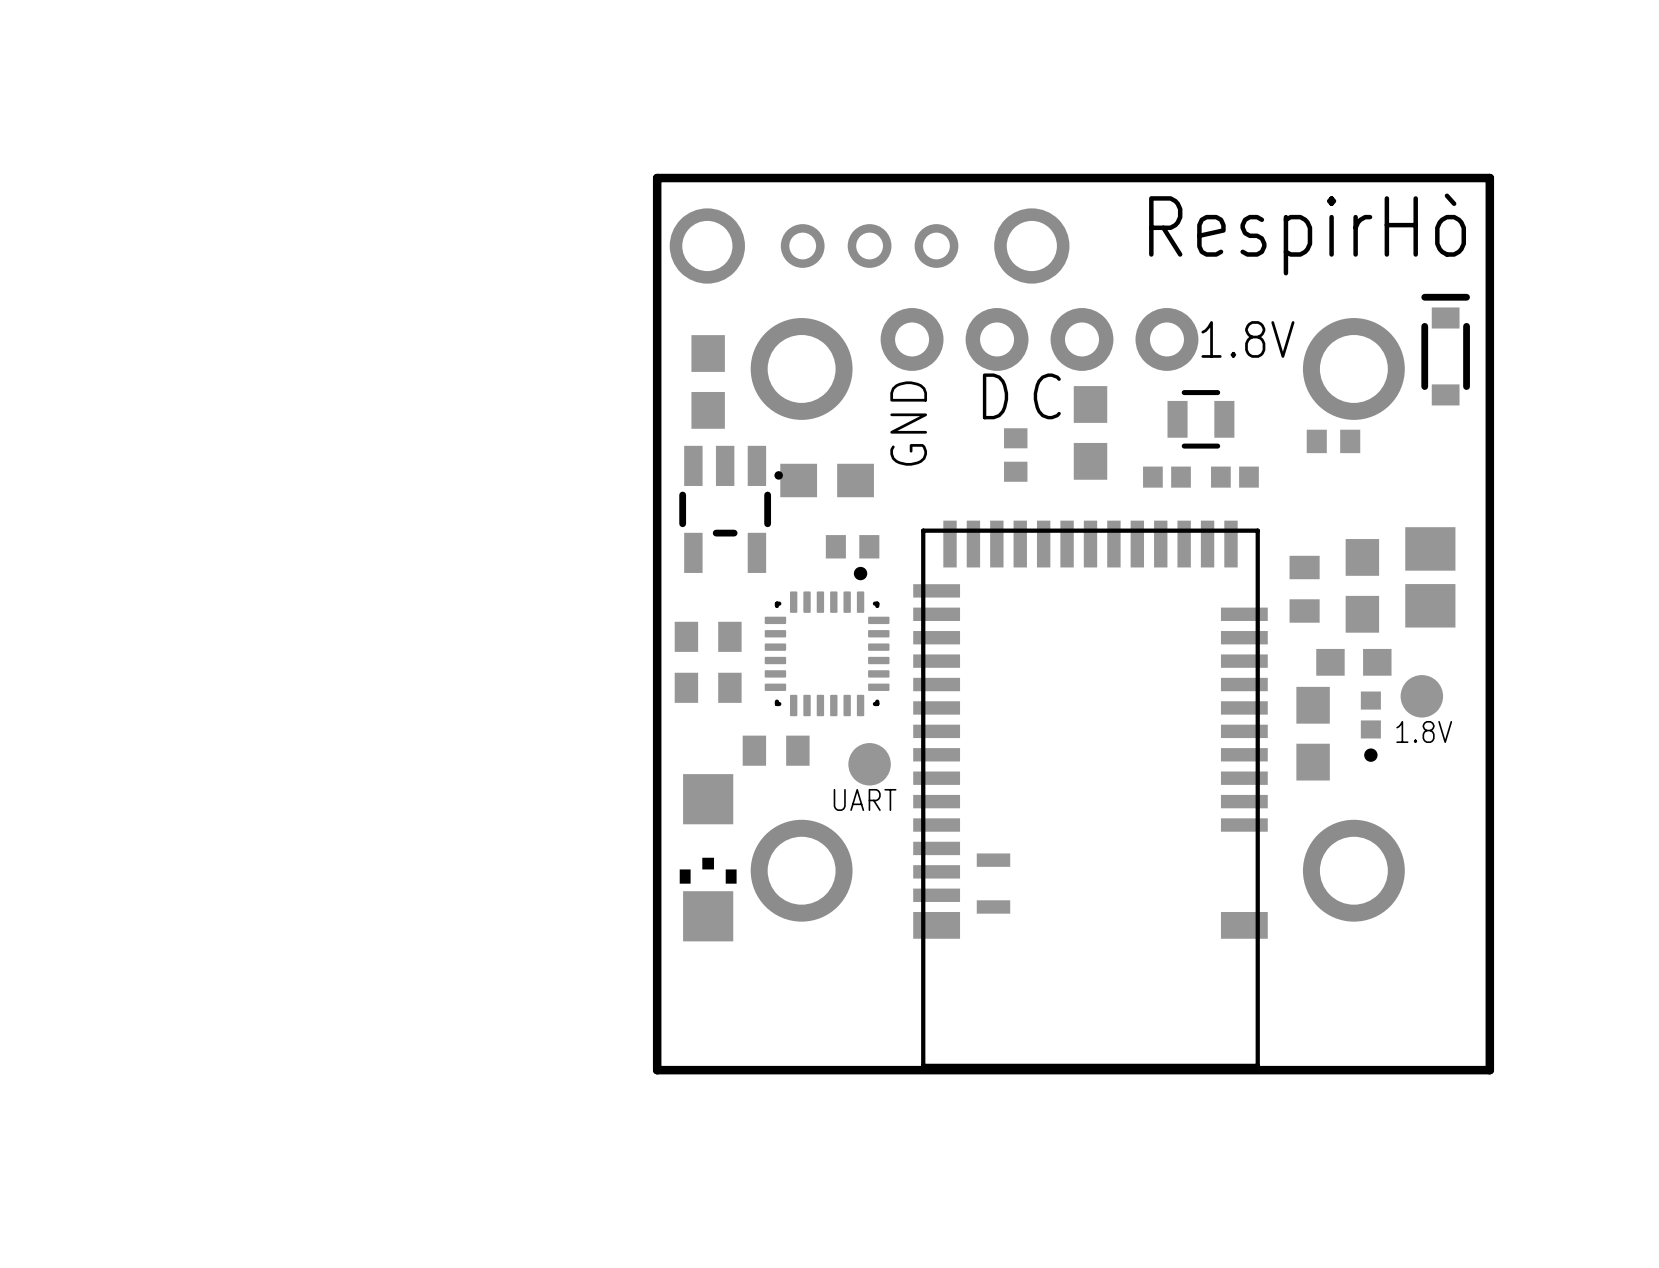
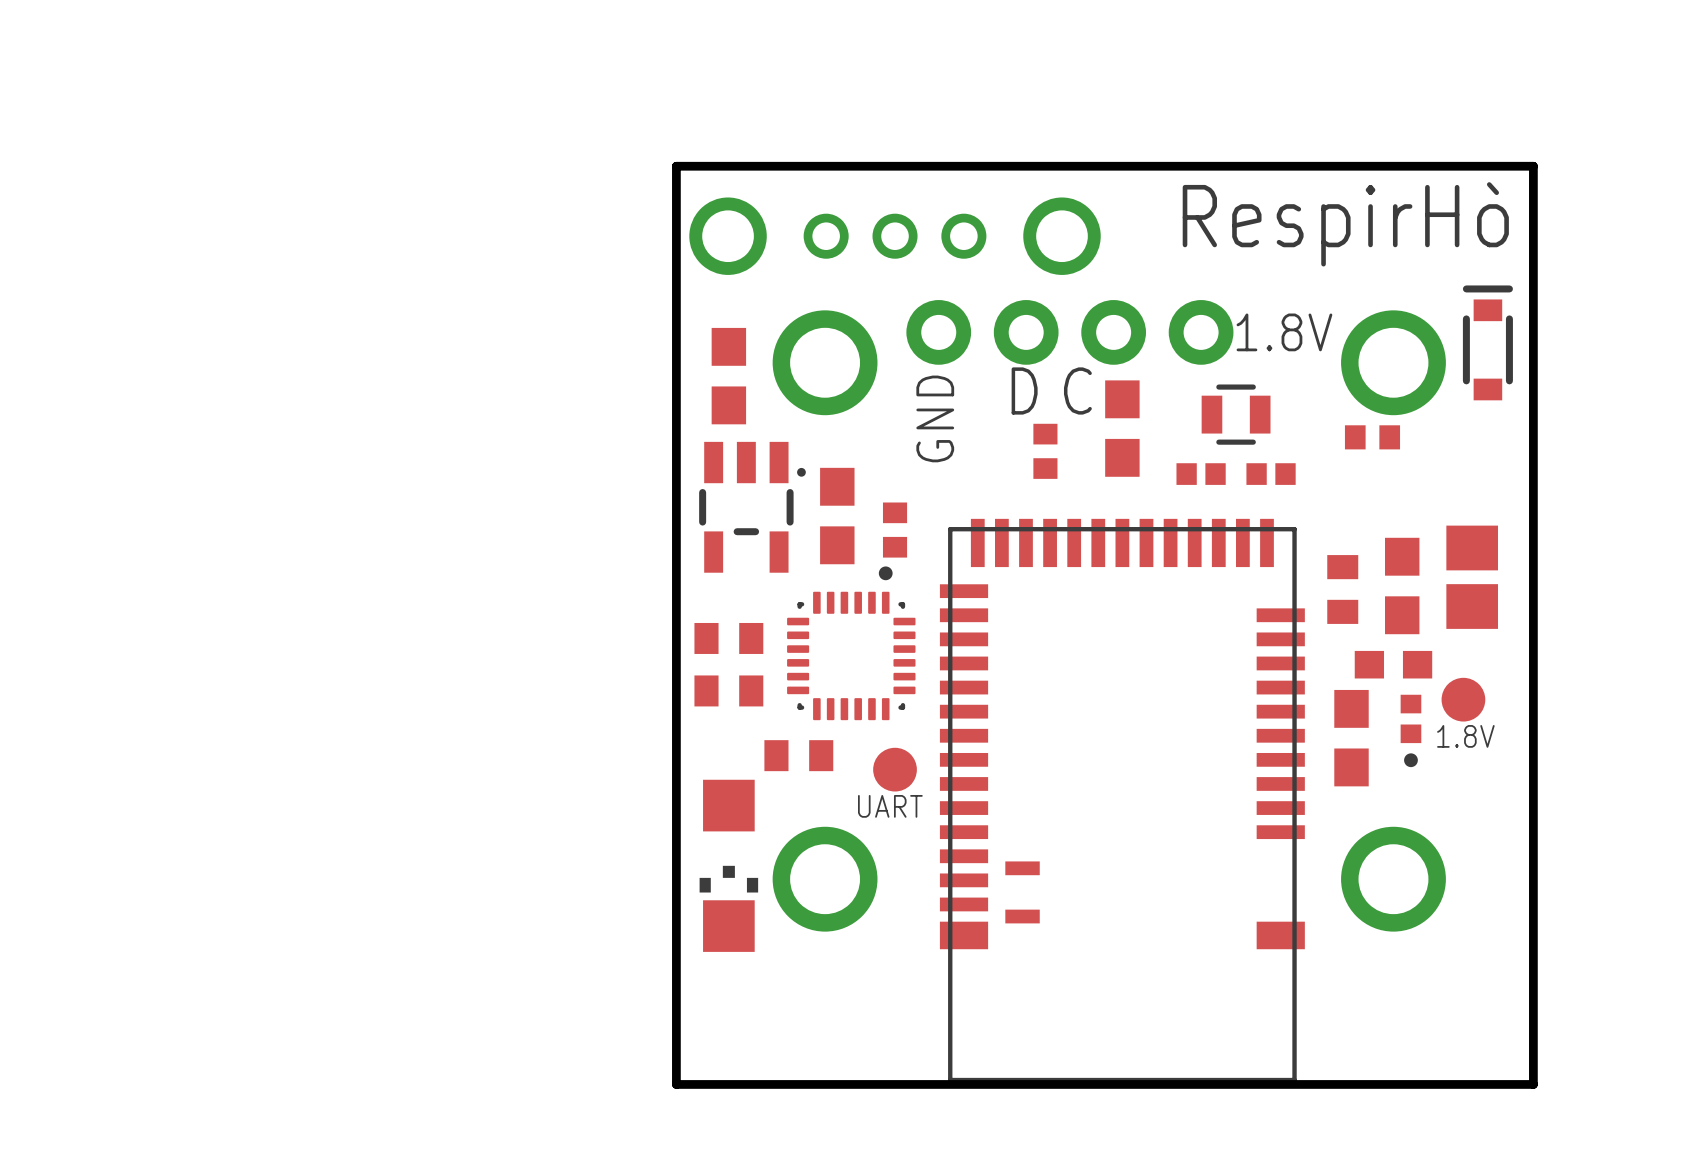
part rotation: 0° (827, 480) -> 90° clockwise (837, 516)
part rotation: 0° (852, 546) -> 90° clockwise (895, 530)

